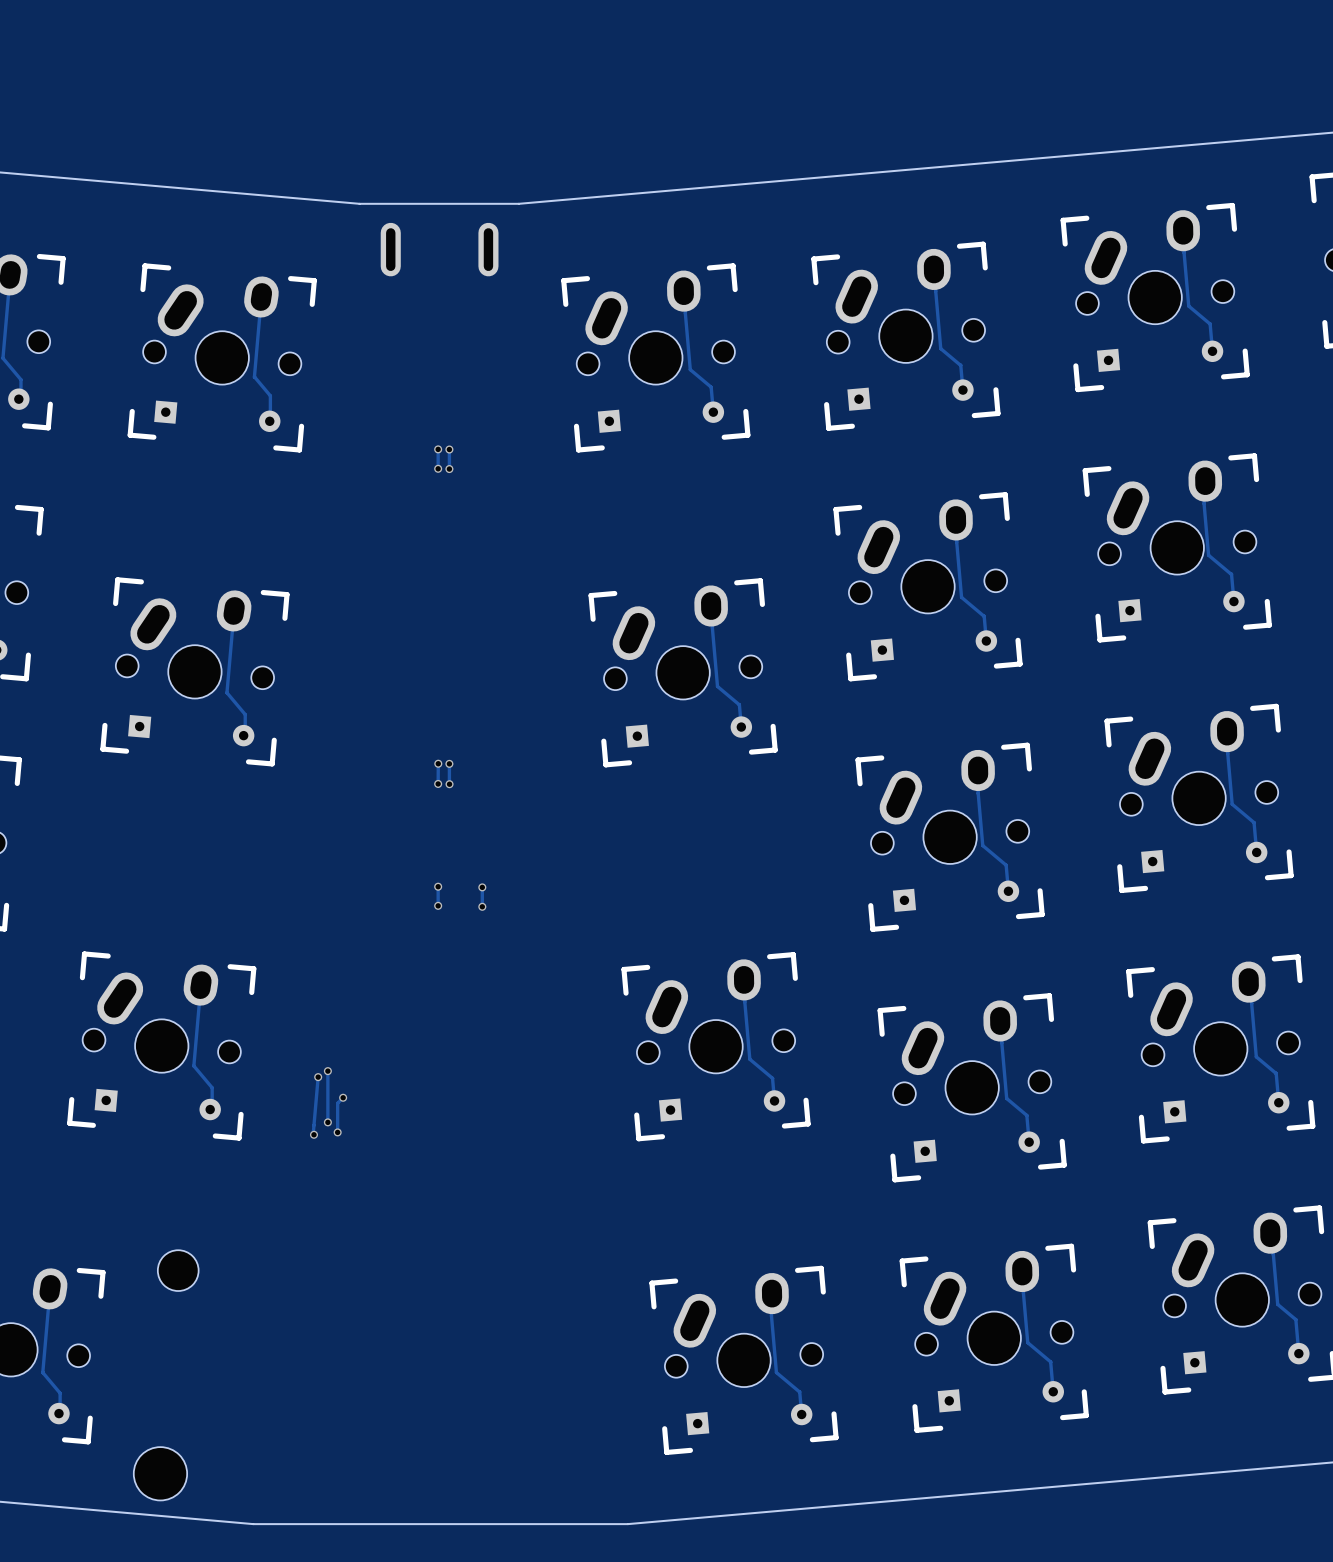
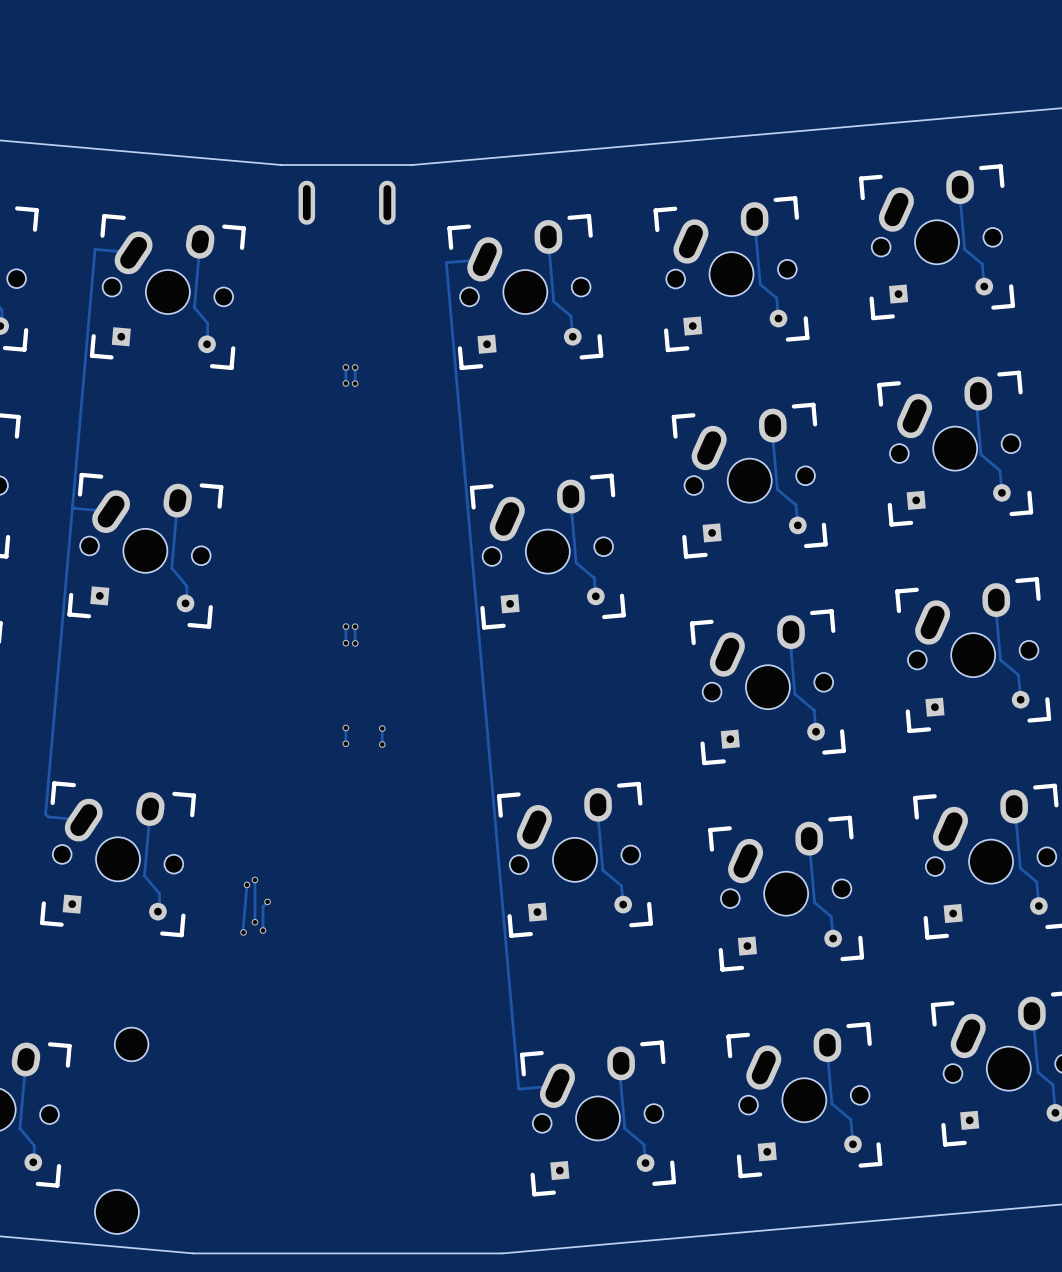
track: none -> (133, 252) (95, 249) (45, 814) (48, 816)
track: none -> (484, 259) (446, 262) (518, 1088) (557, 1085)
track: none -> (72, 506) (74, 508) (111, 511)
track: none -> (48, 816) (83, 820)

